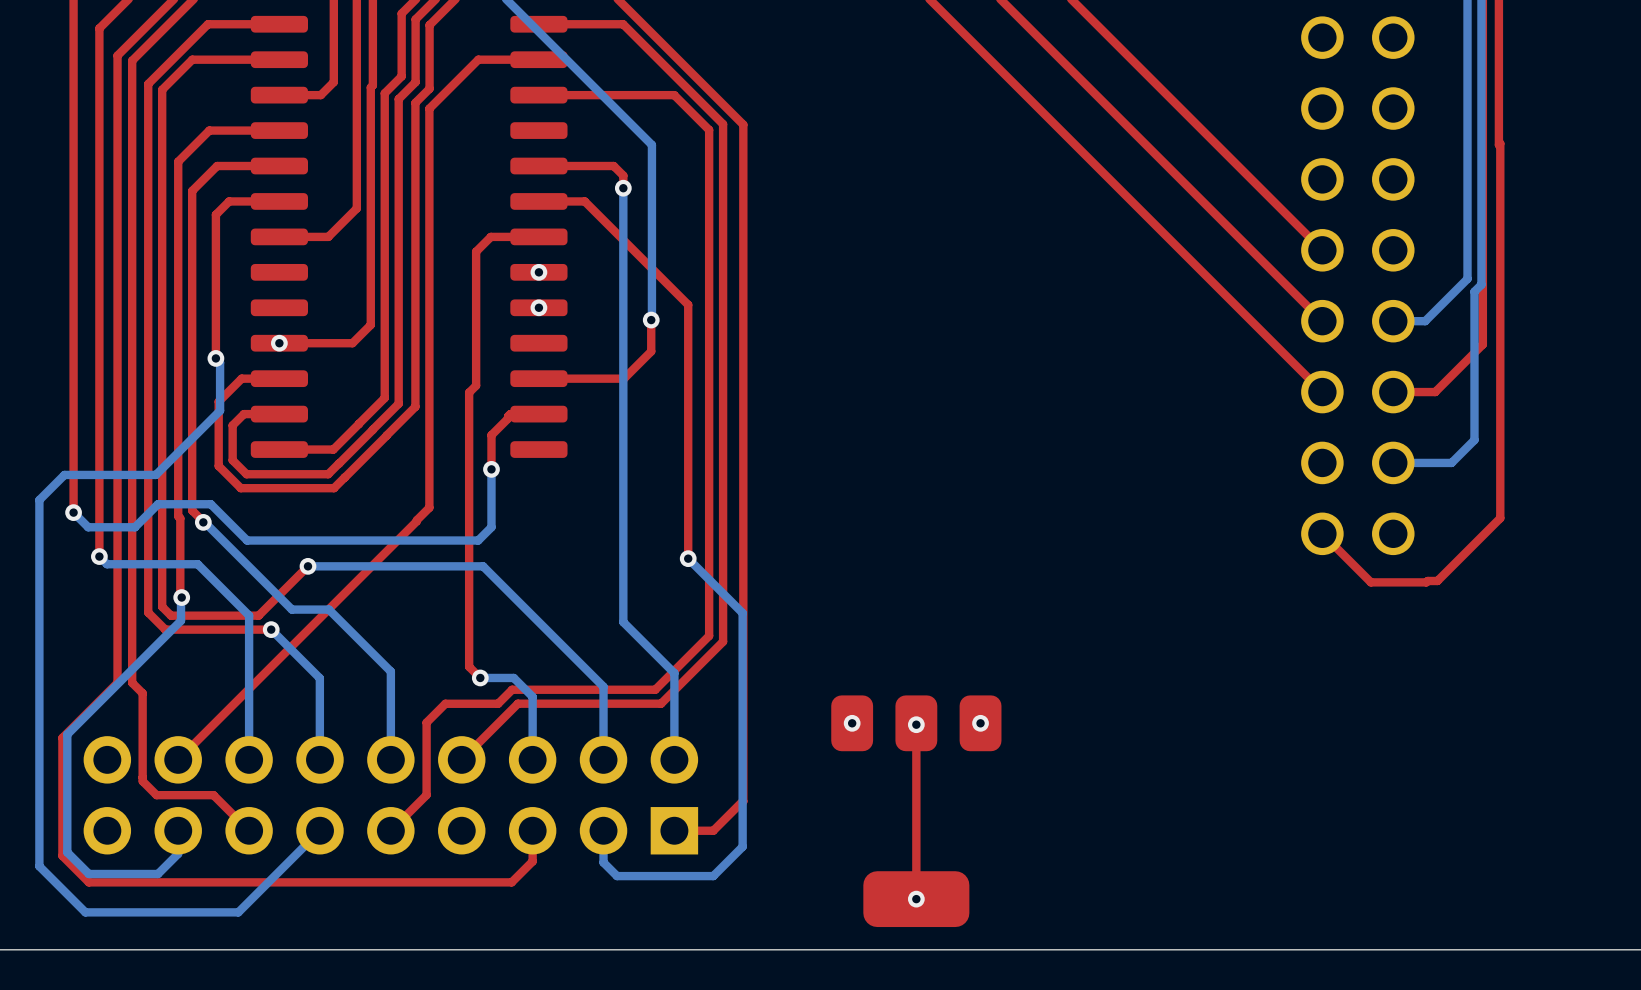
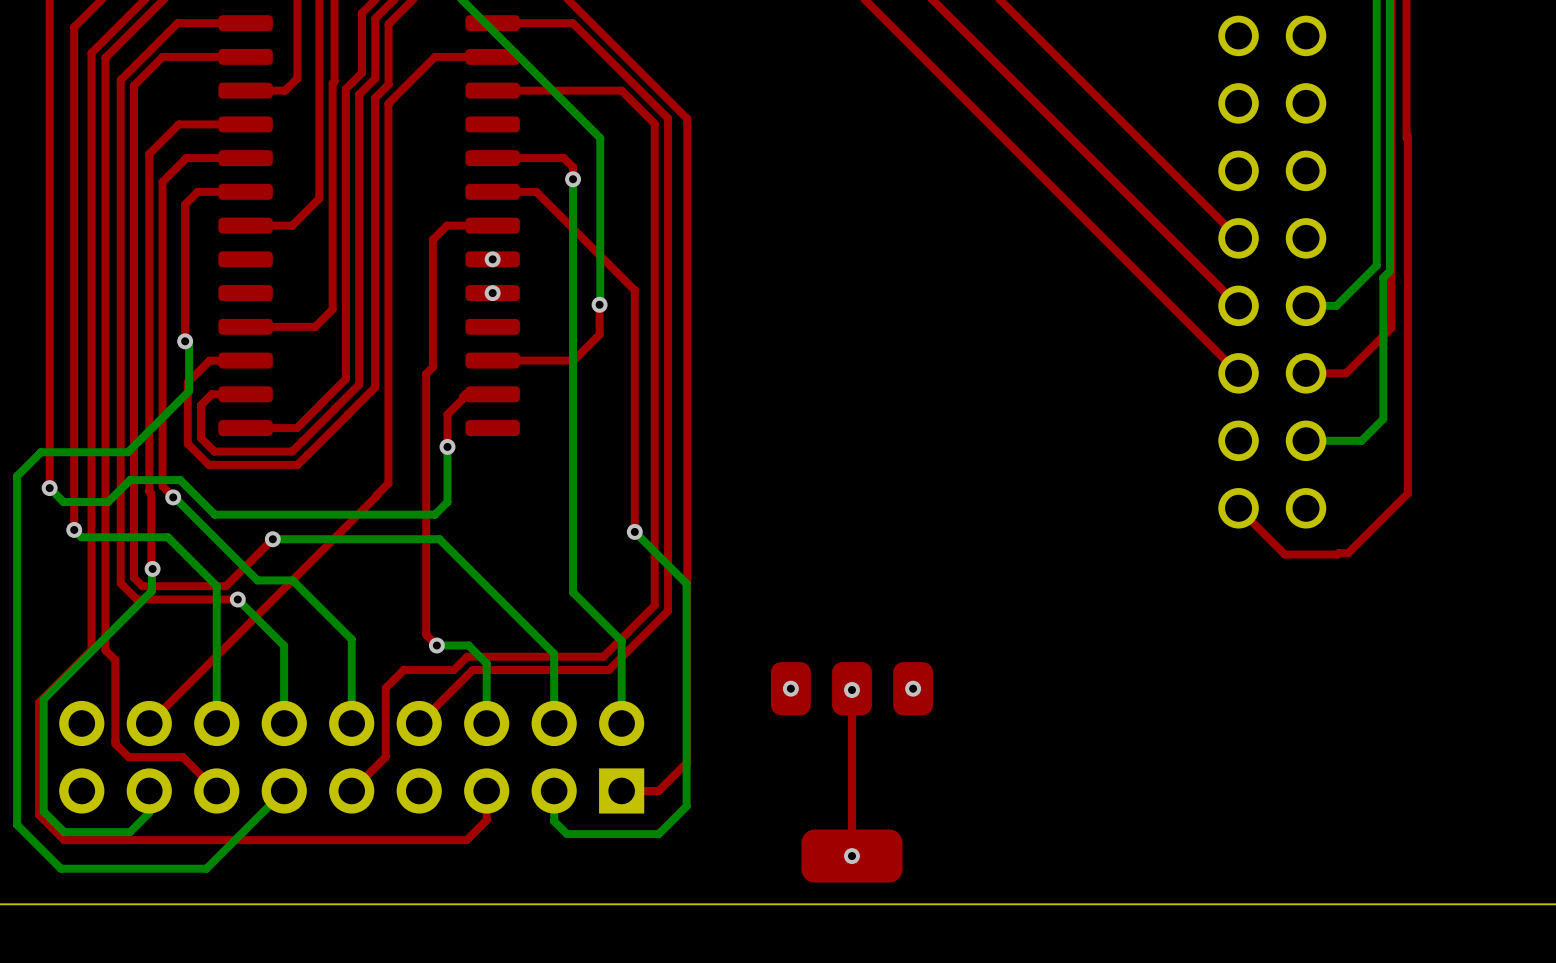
via: (279, 343) -> none

